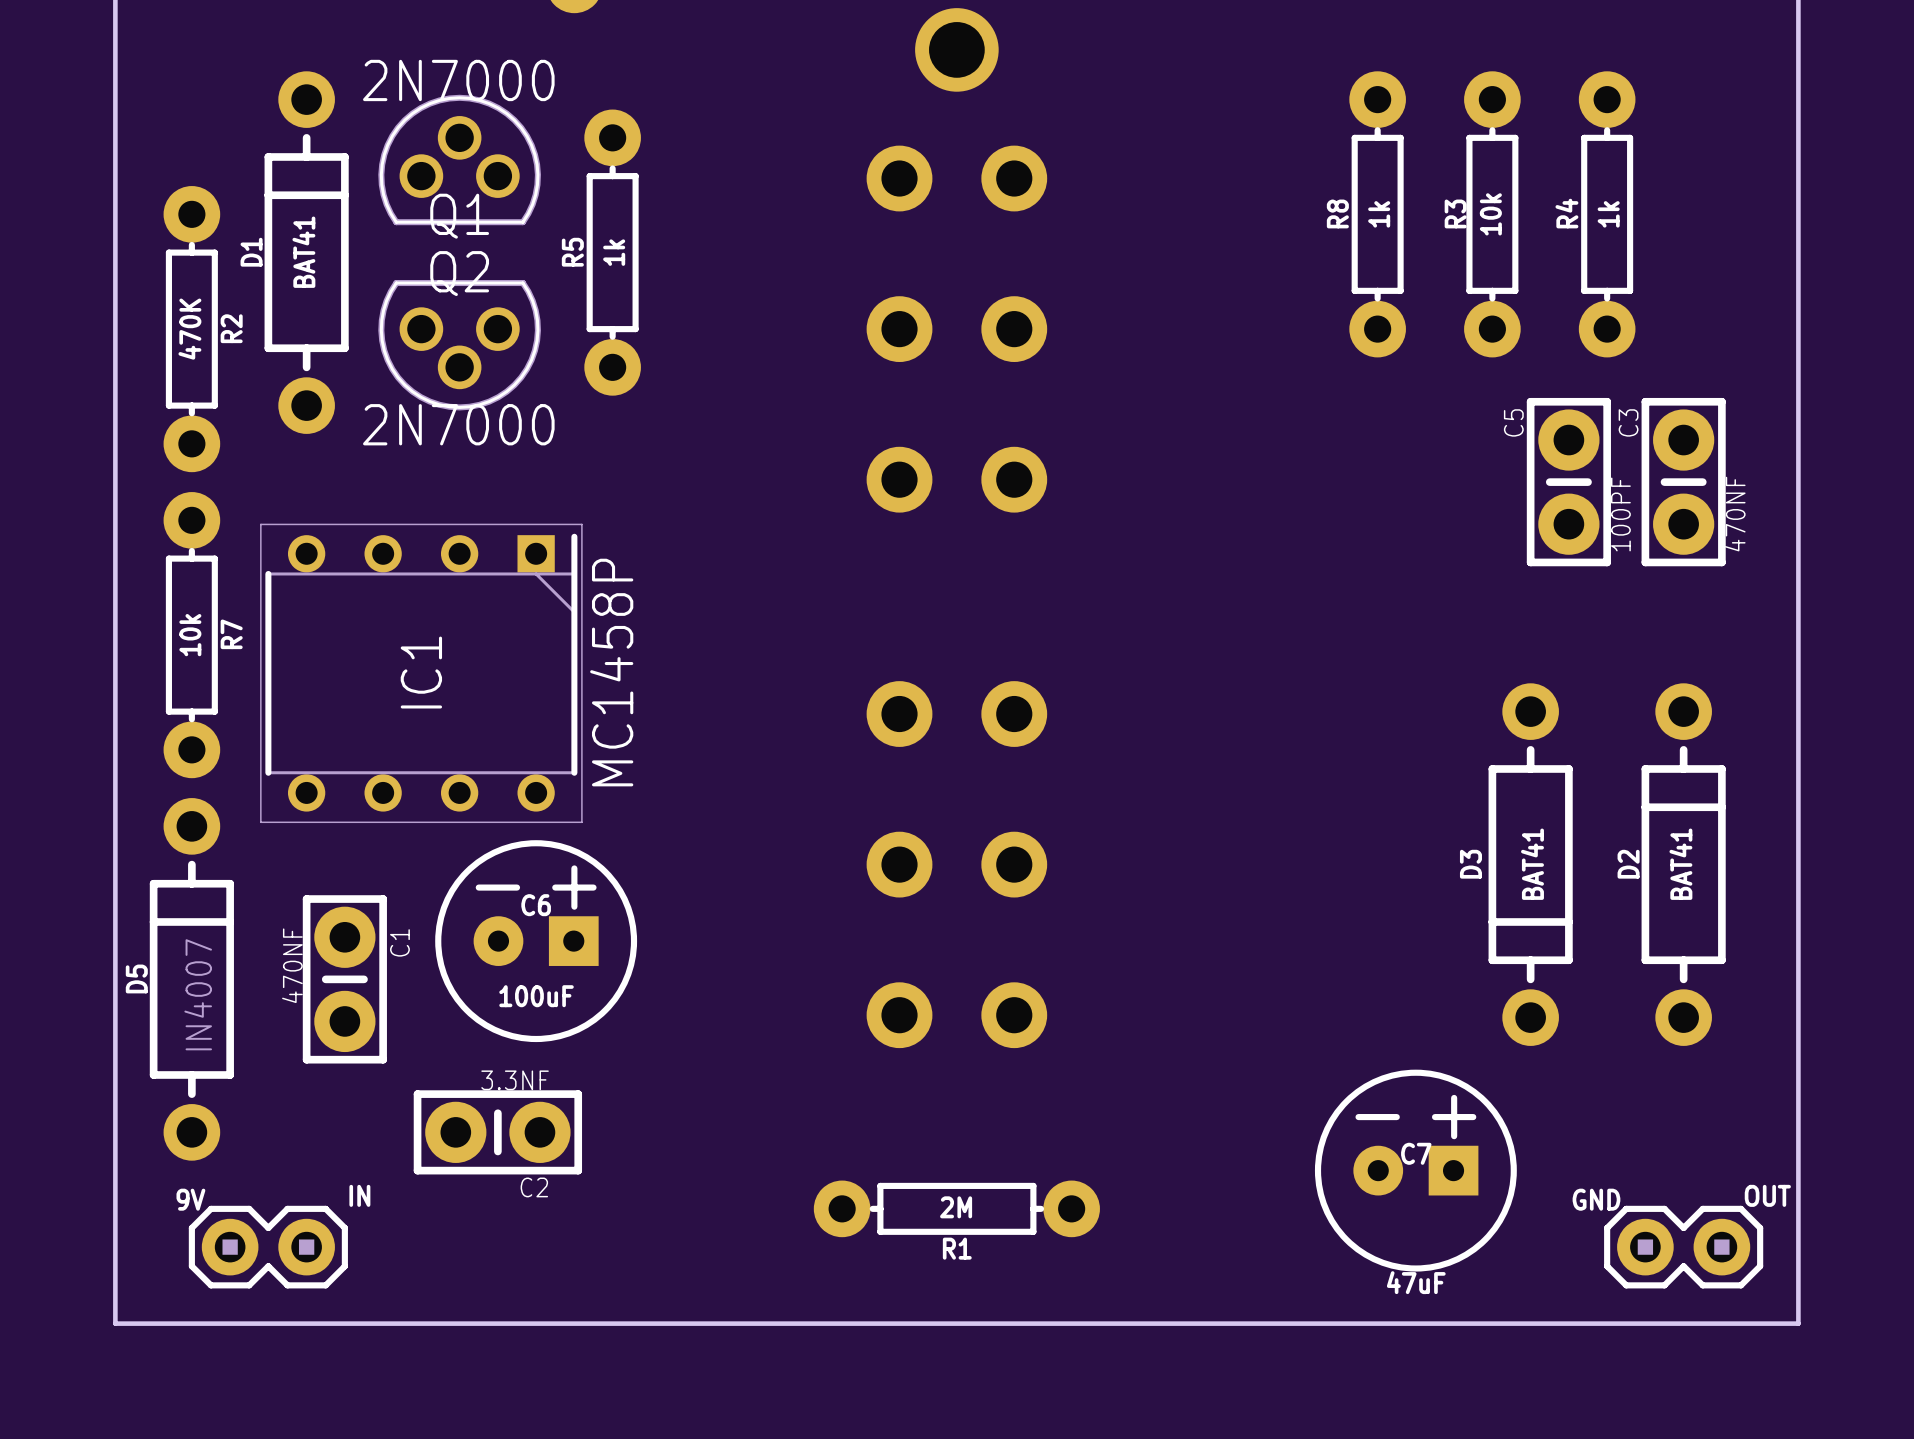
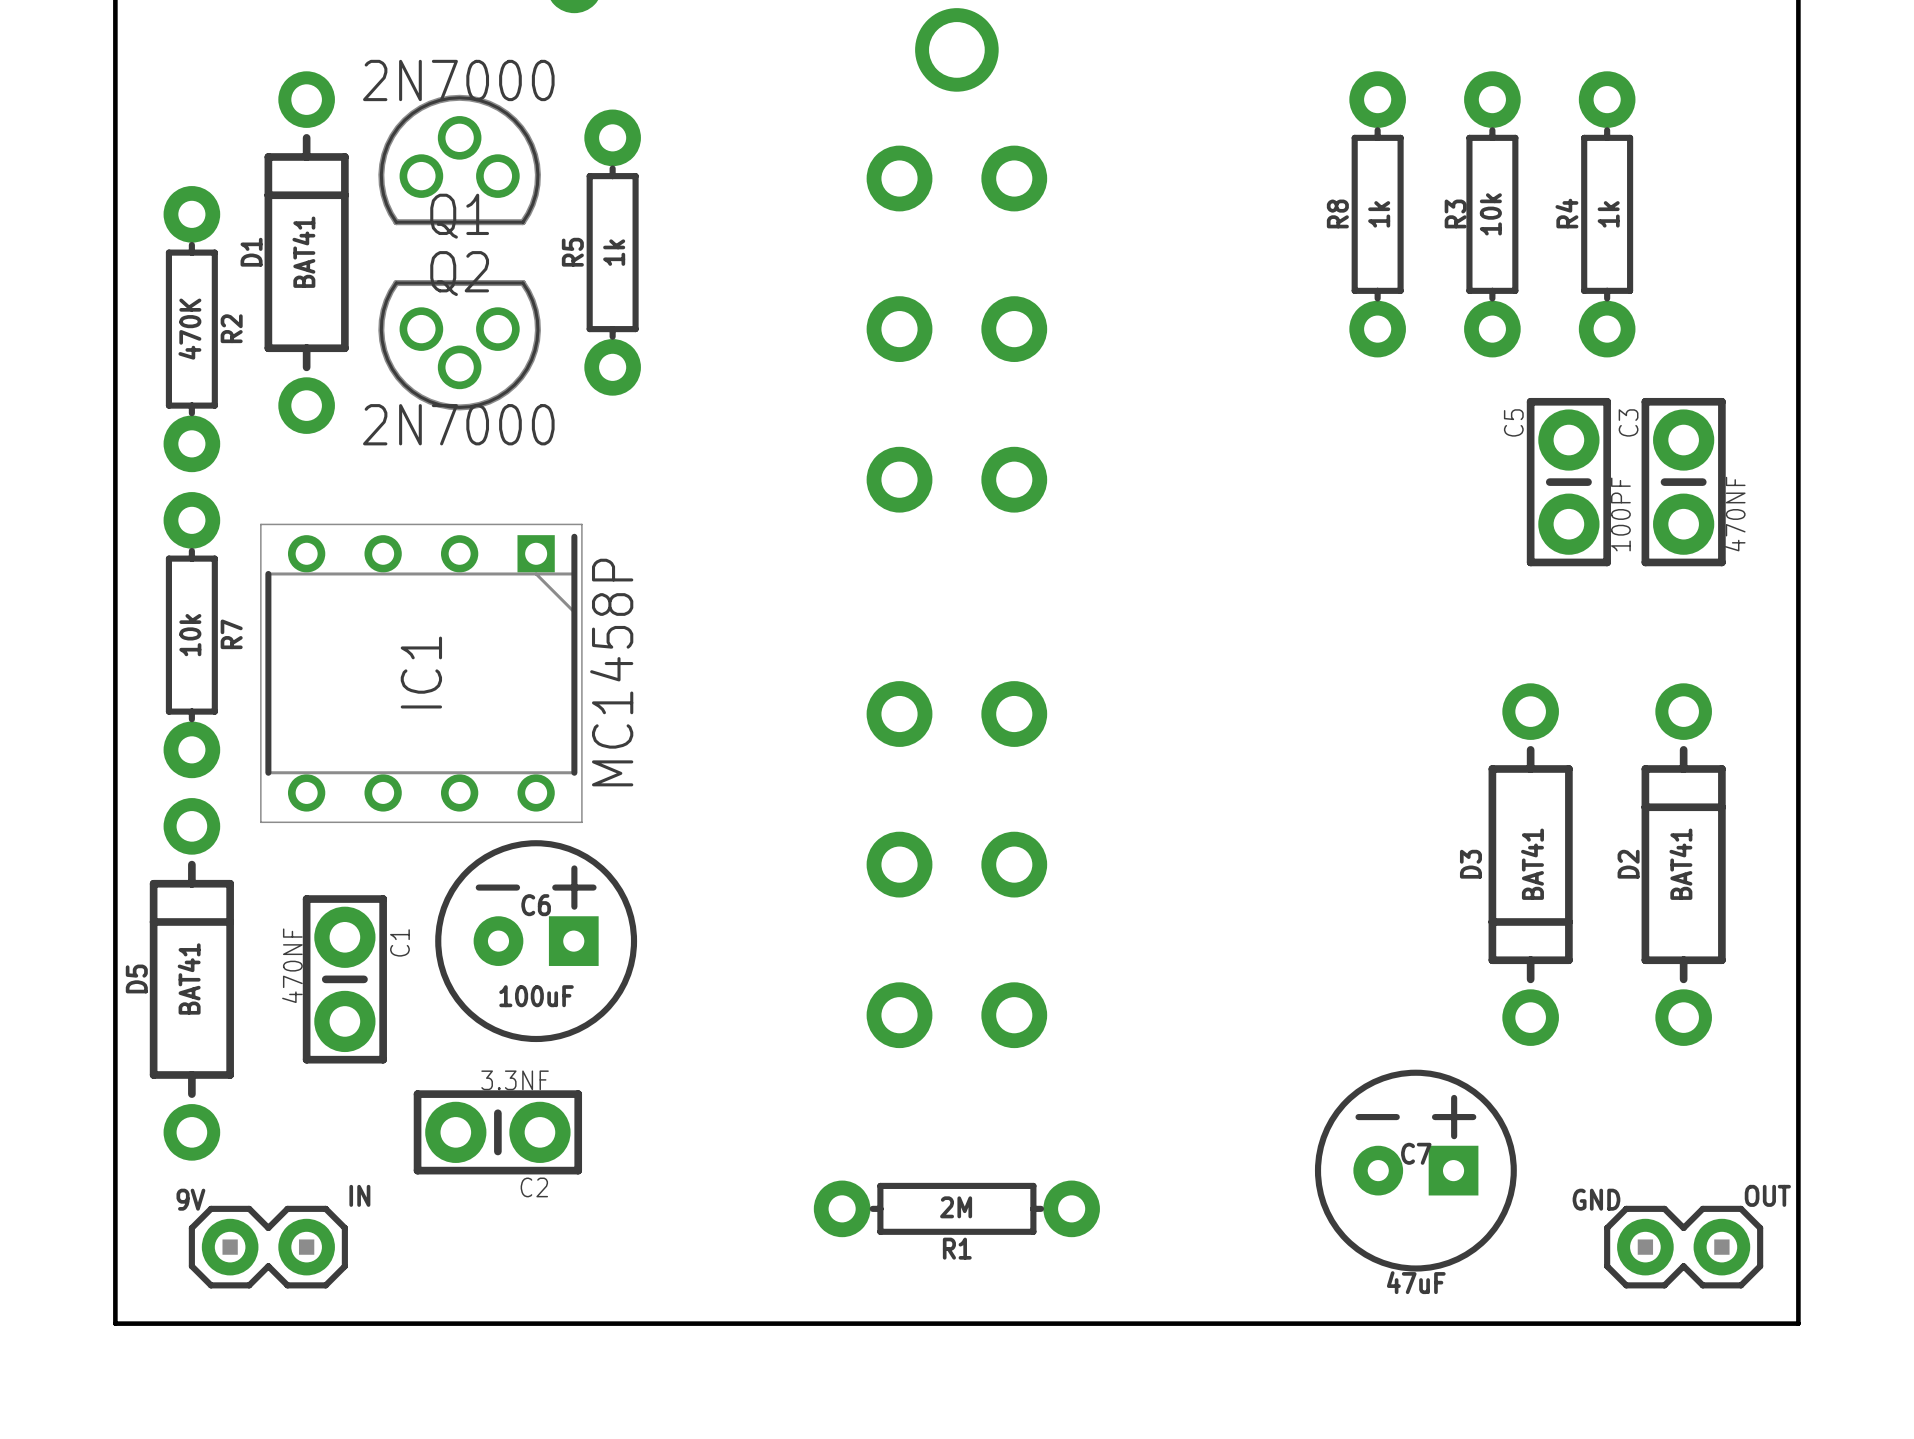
D5 value: none -> BAT41 (189, 978)
text: IN4007 (198, 994) -> none

